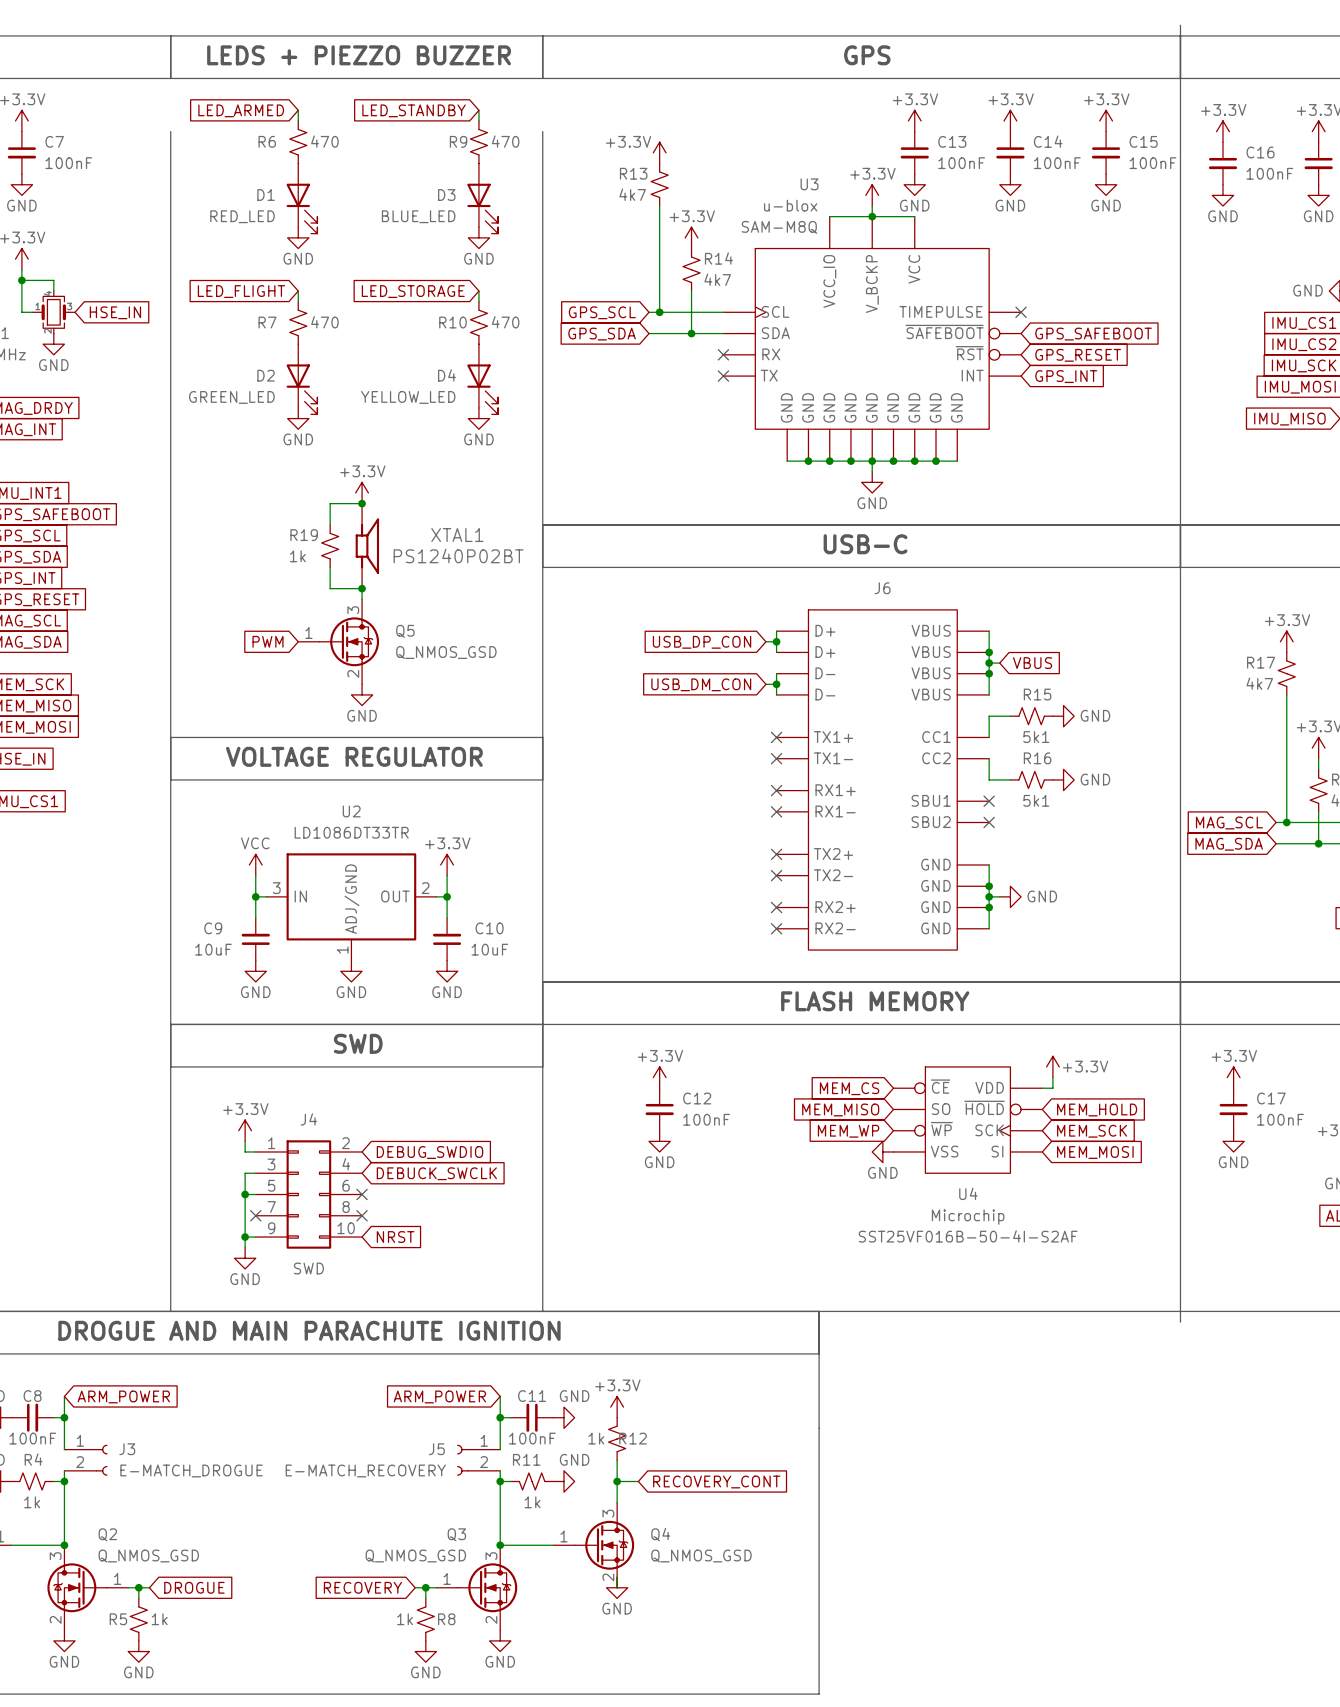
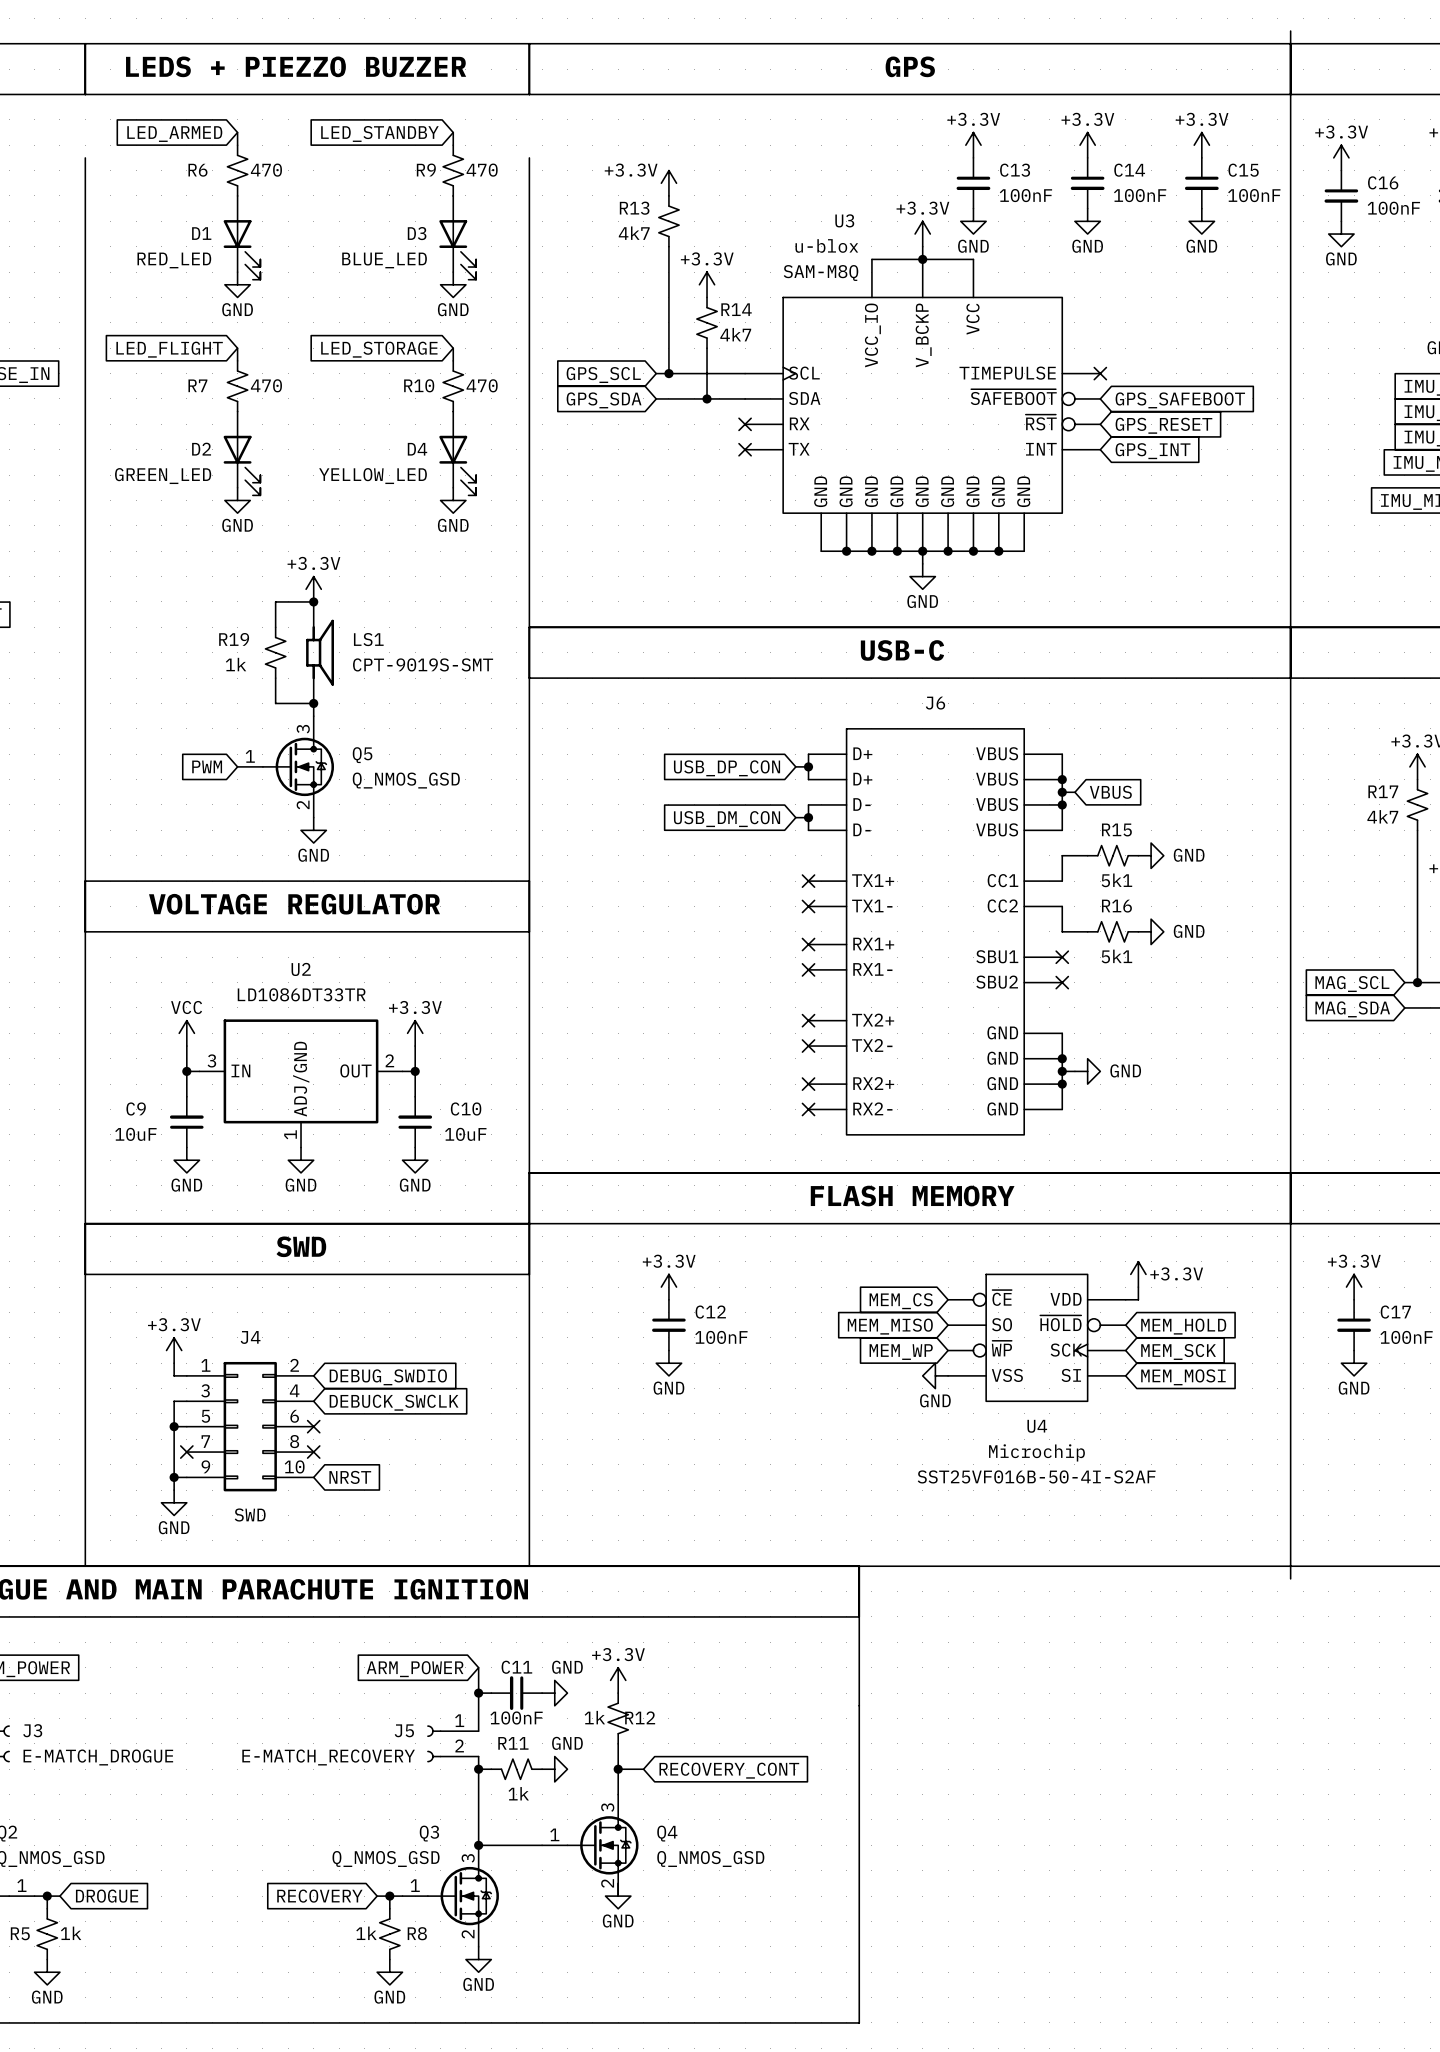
R19 name position: R19 (304, 535) -> R19 (234, 639)
XTAL1 name: XTAL1 (457, 535) -> LS1 (368, 639)
XTAL1 value: PS1240P02BT (458, 555) -> CPT-9019S-SMT (423, 664)

